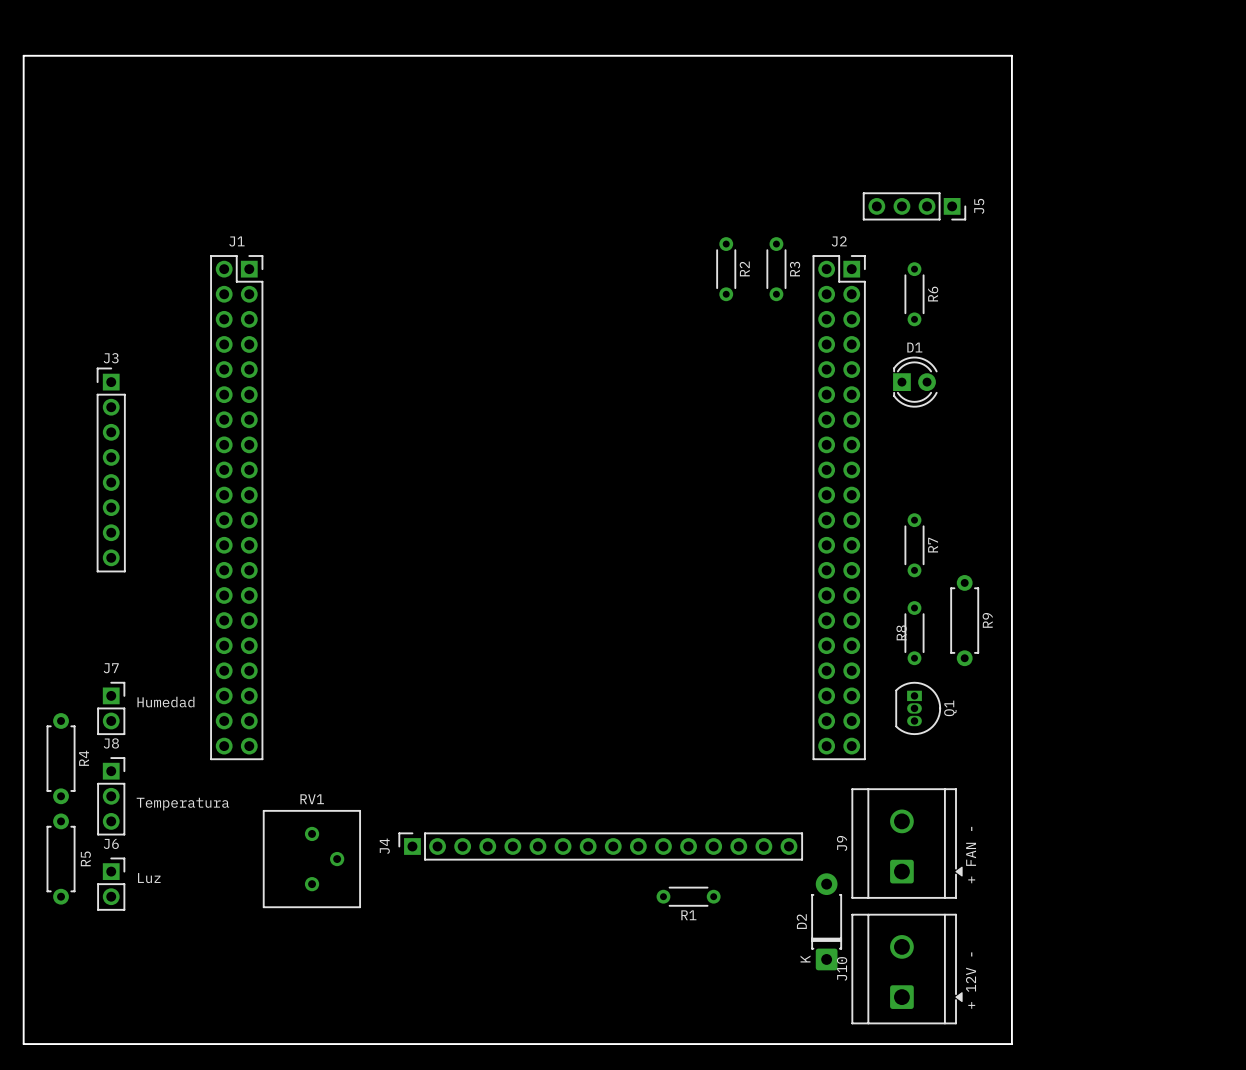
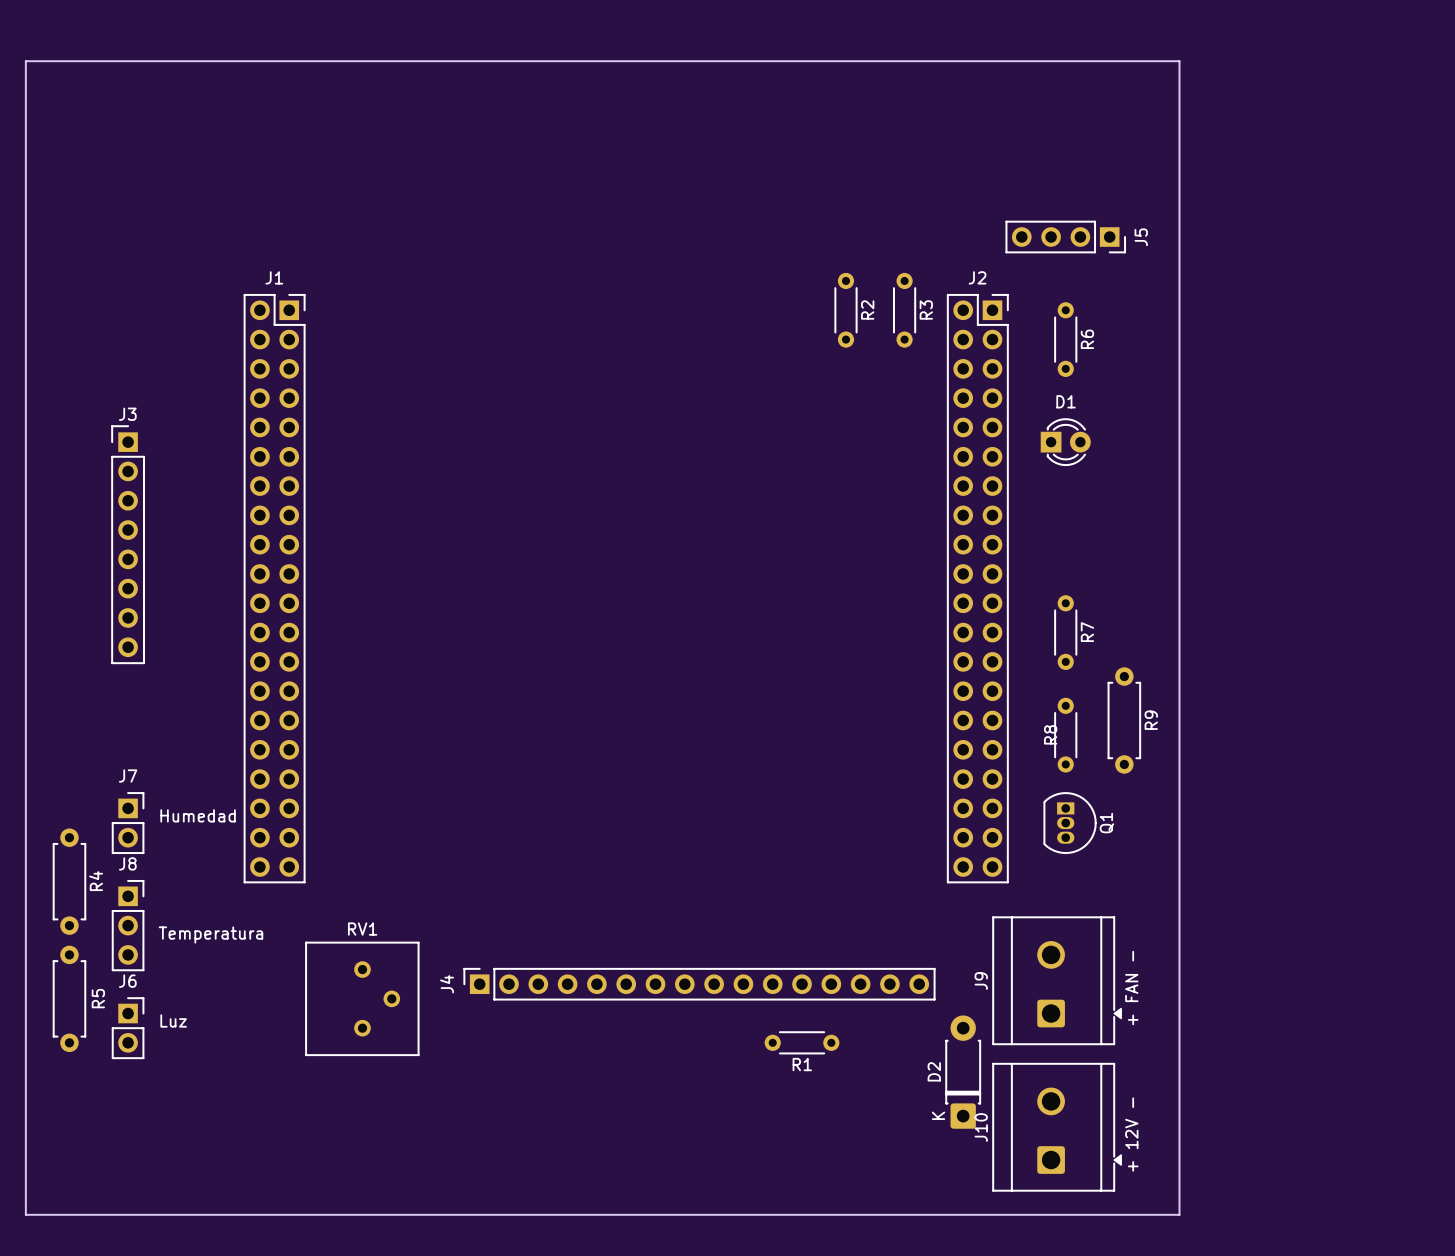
D1 footprint: [893, 356, 938, 408] -> [1040, 418, 1091, 466]

